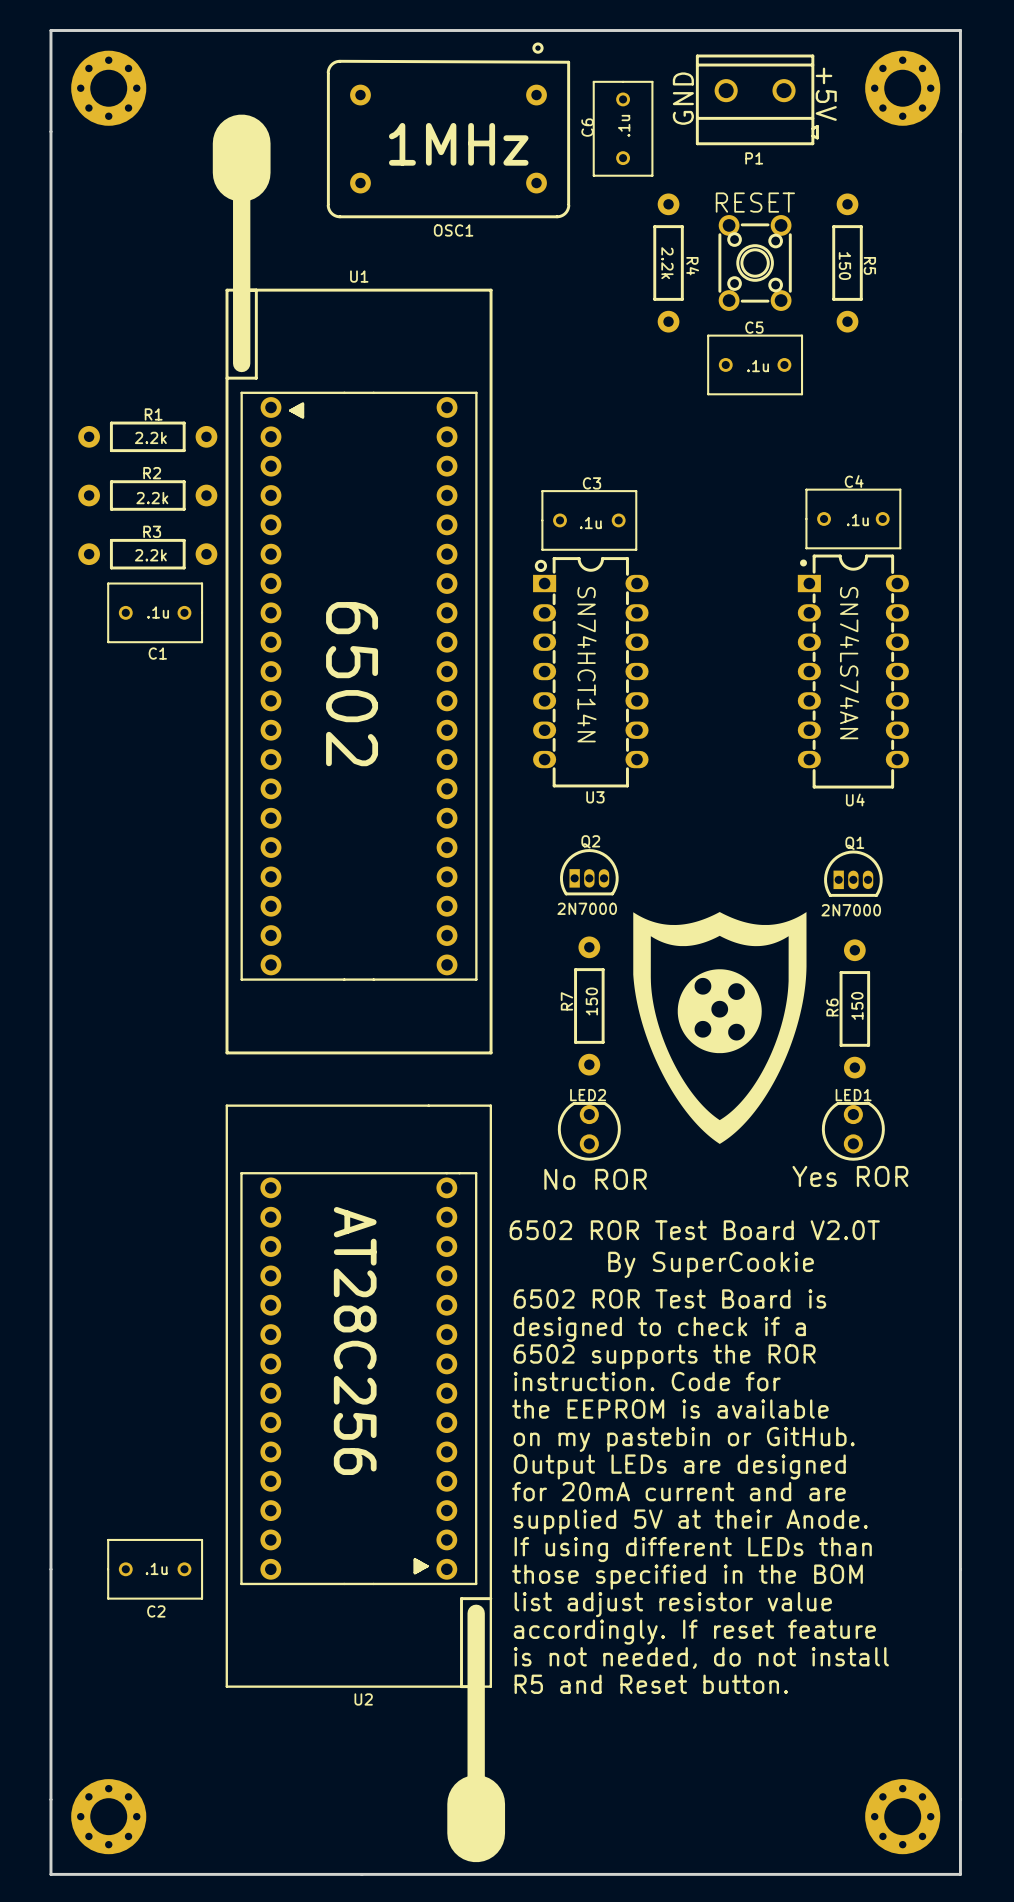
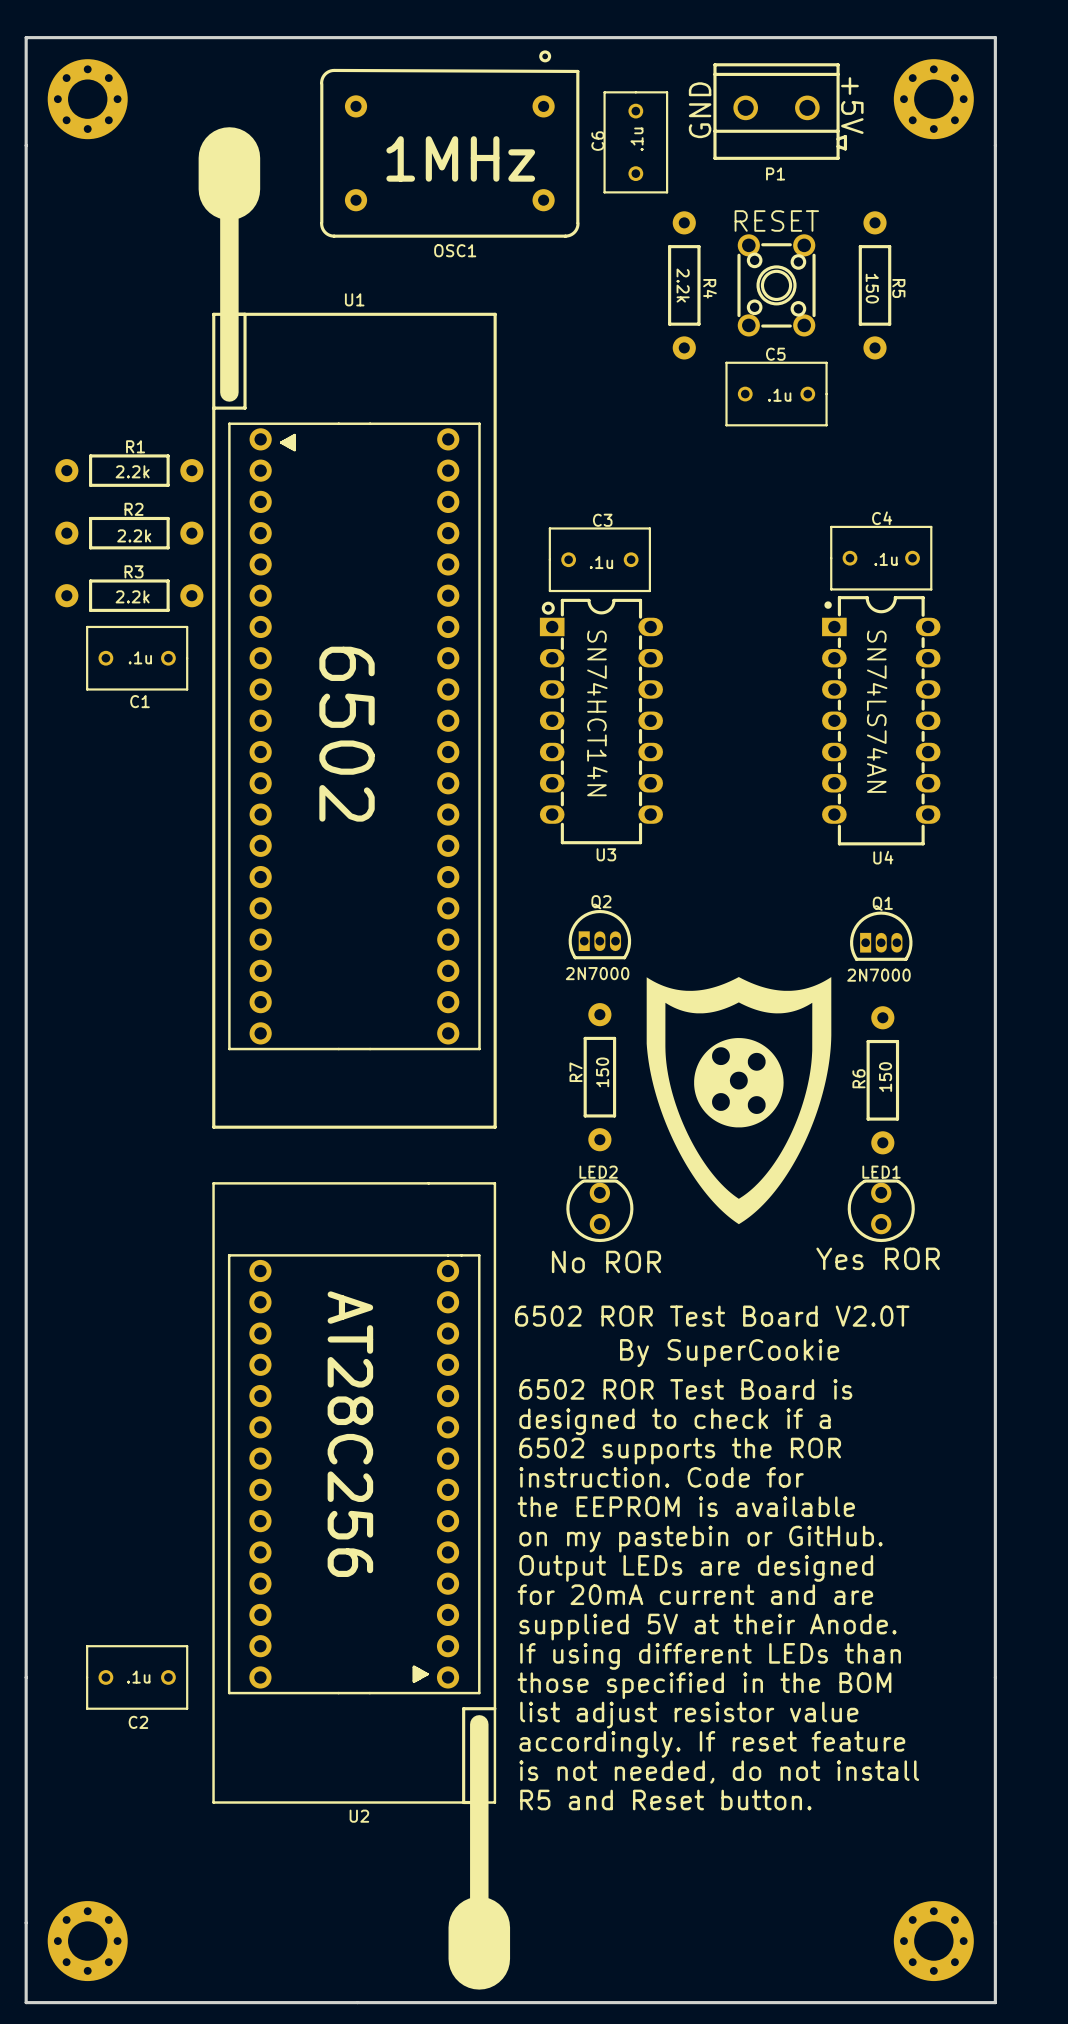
P1 footprint: [695, 54, 819, 146] -> [713, 63, 848, 160]

